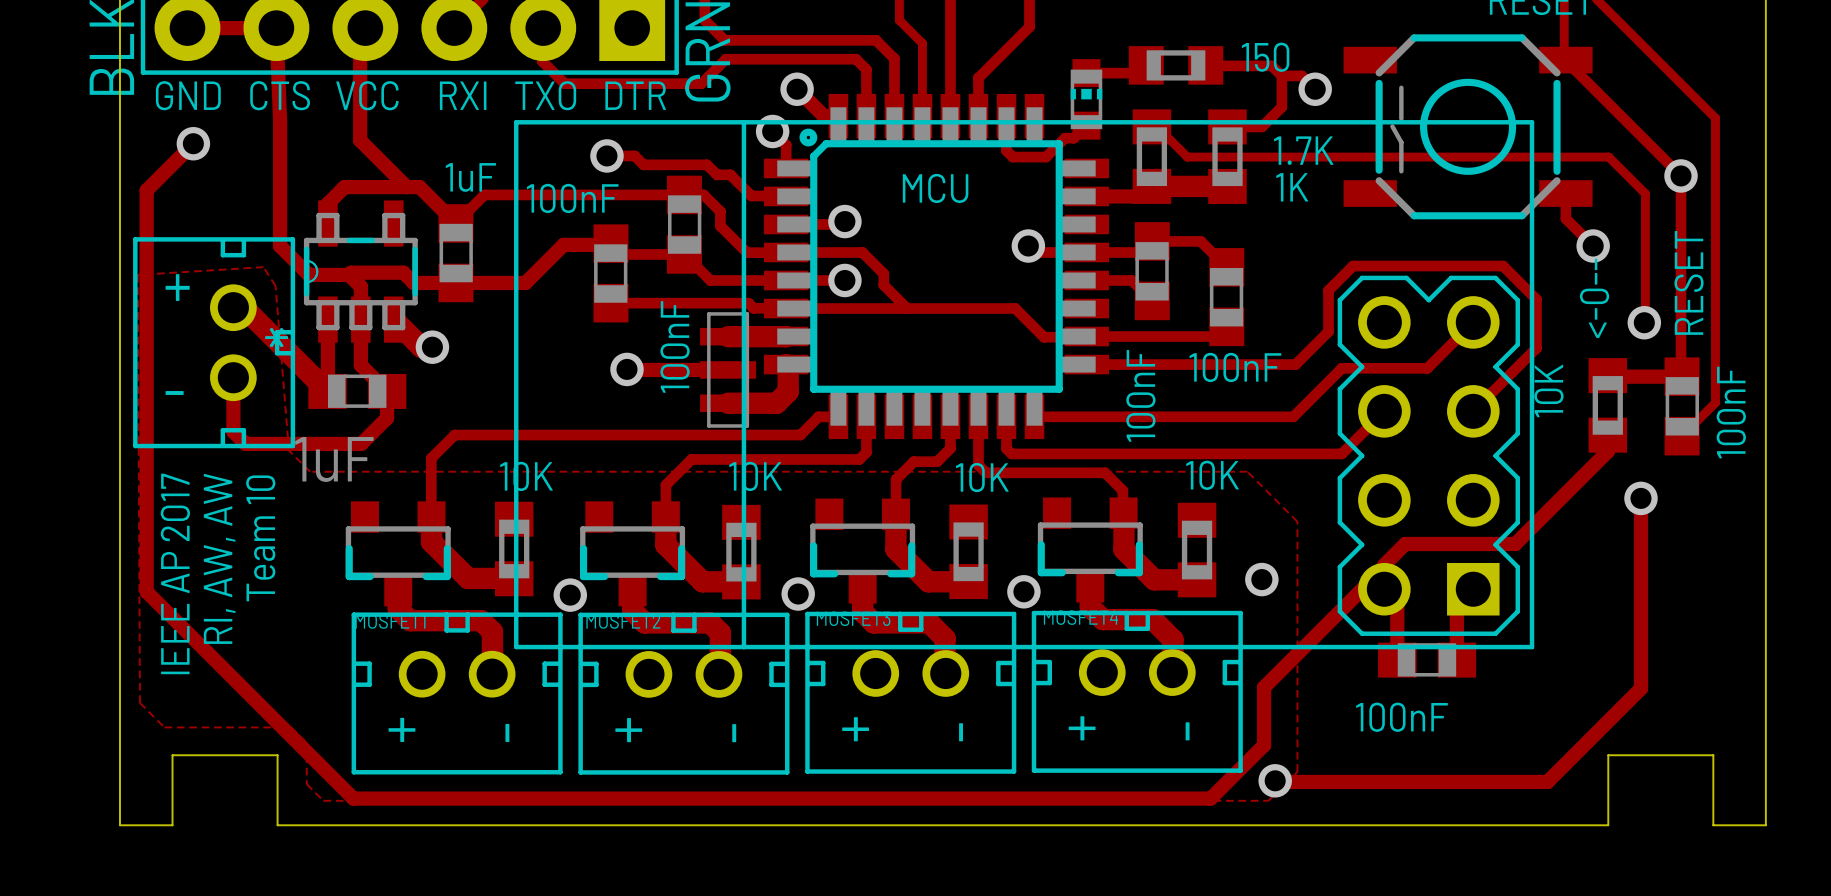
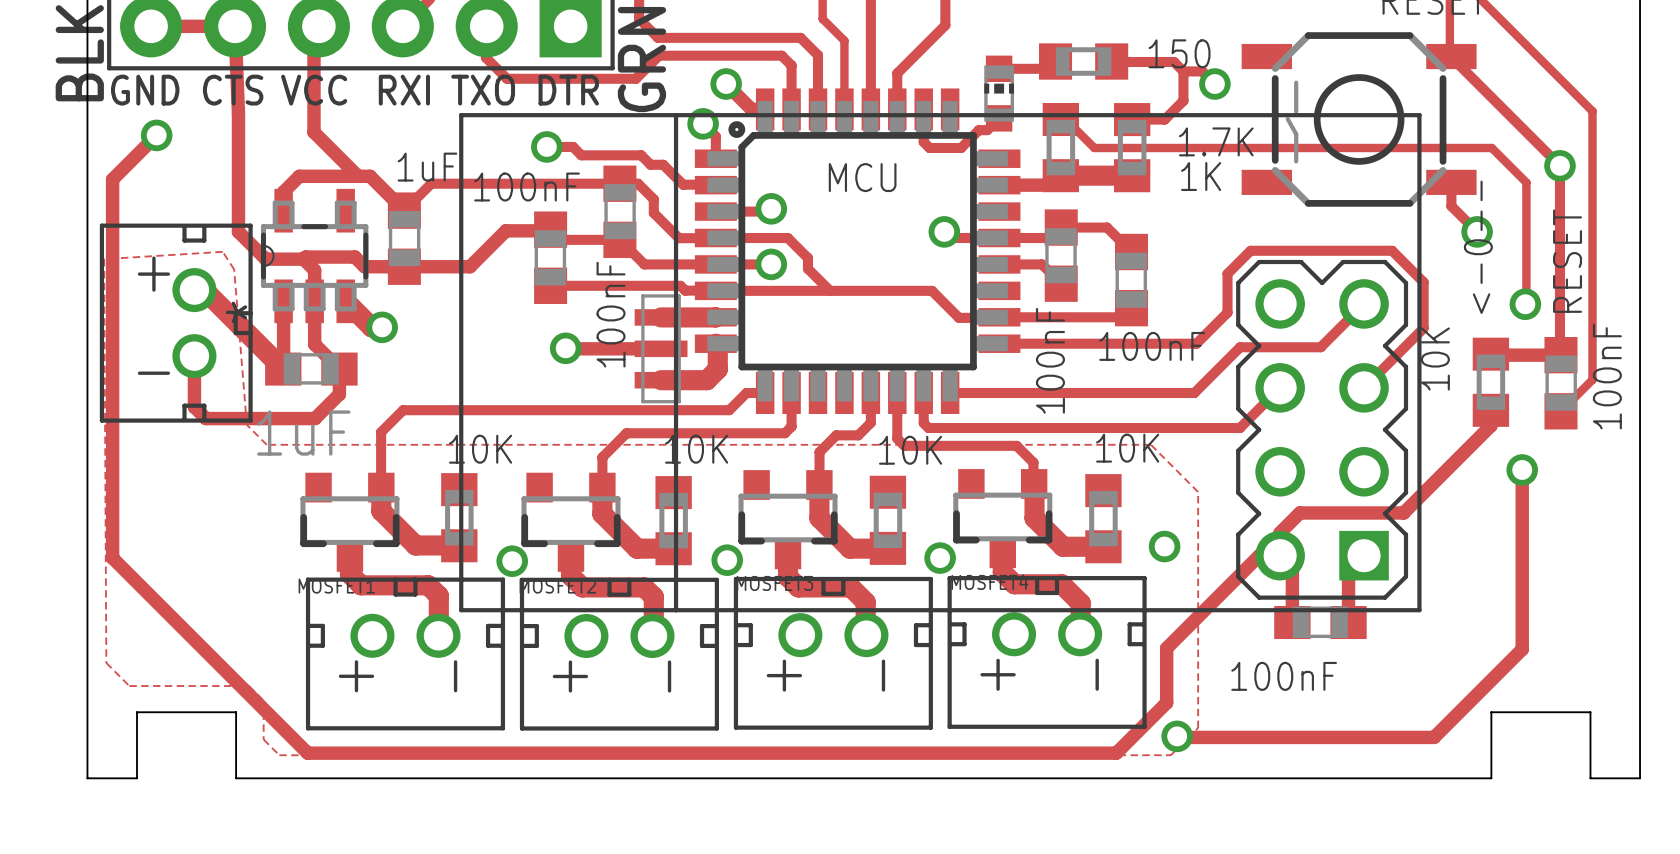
text: Team 10 (260, 538) -> none
text: RI, AW, AW (219, 558) -> none
text: IEEE AP 2017 (175, 573) -> none

